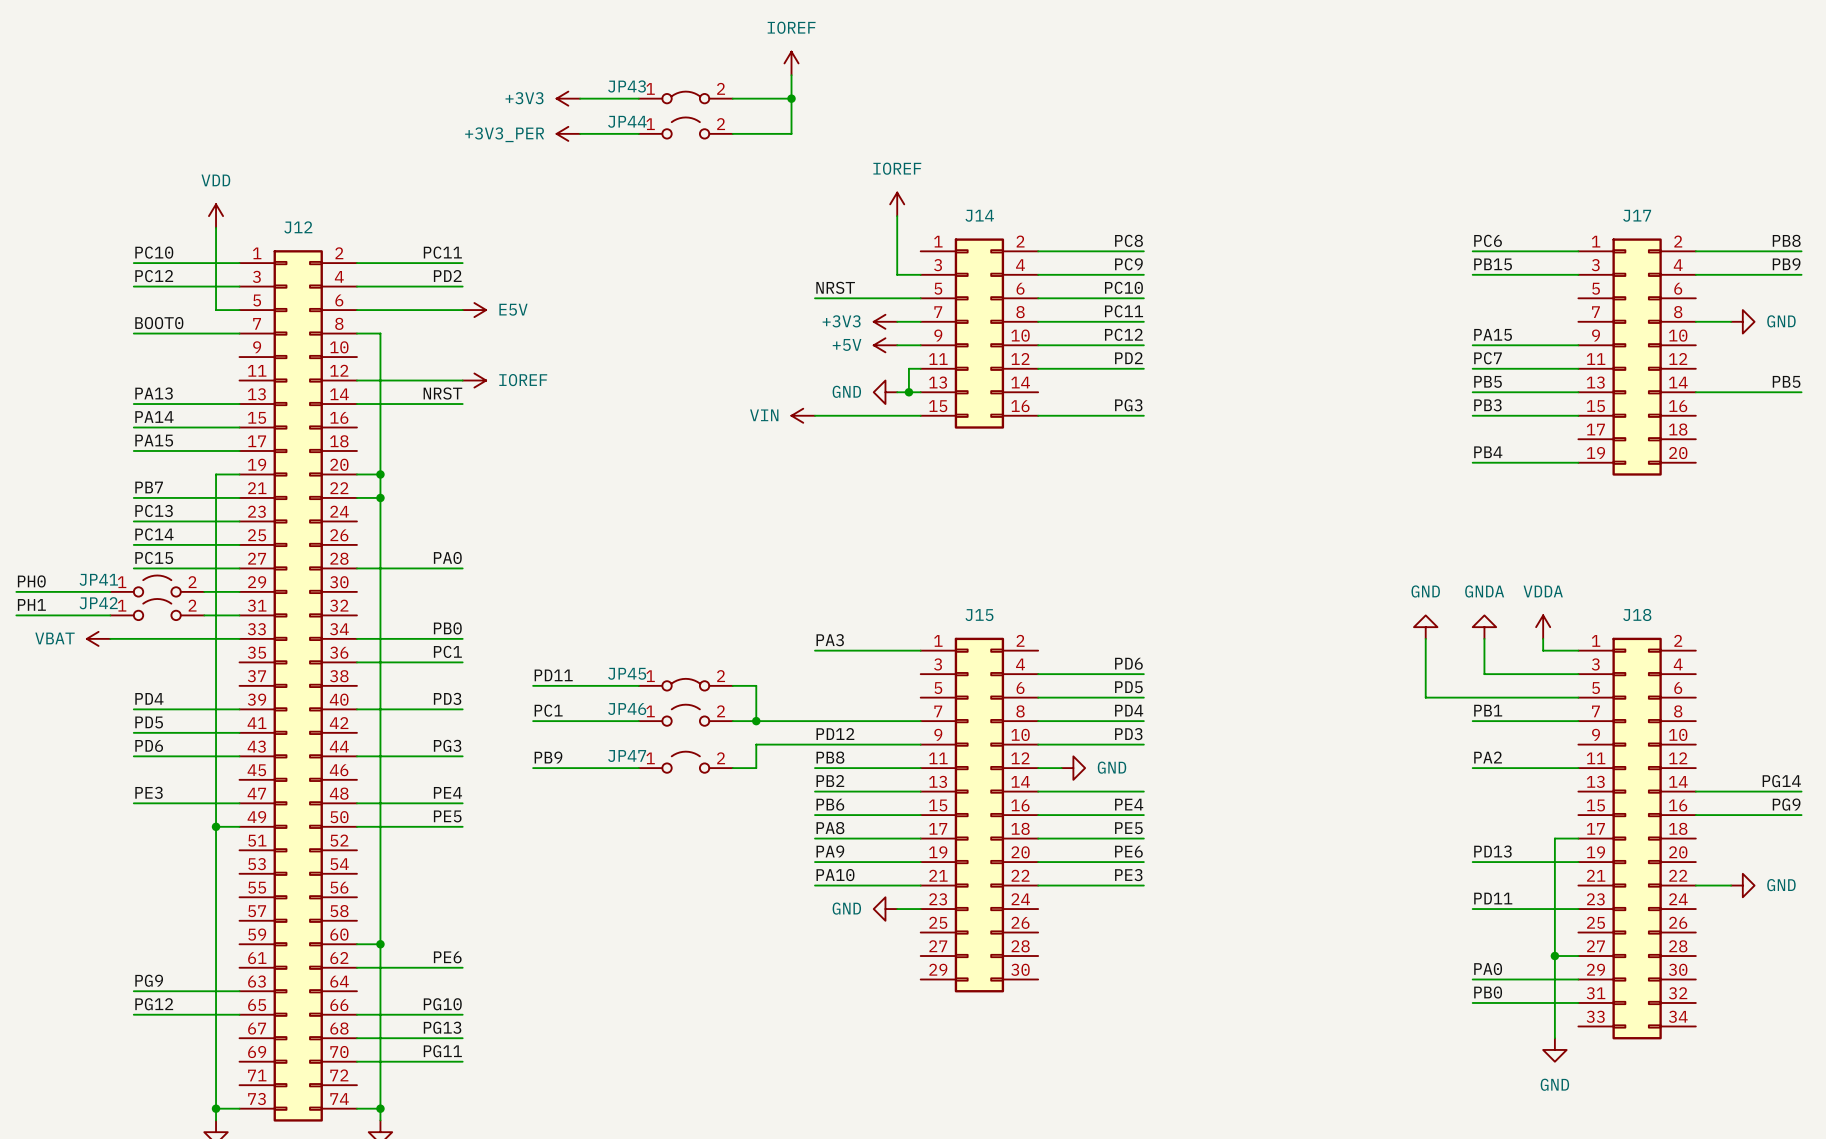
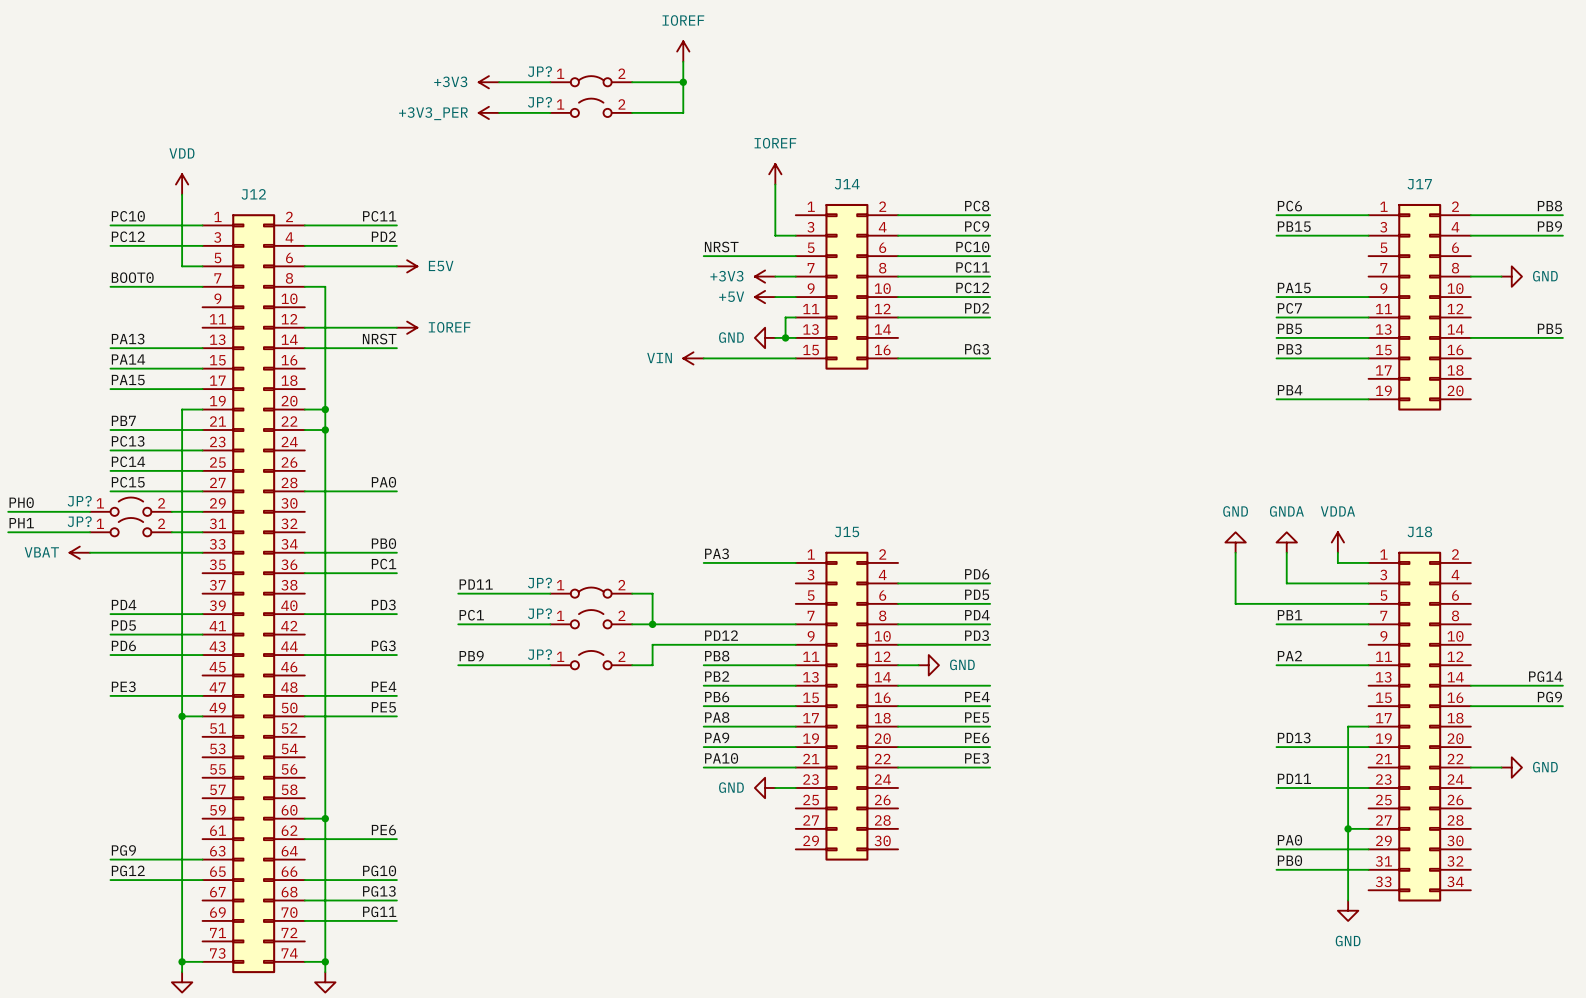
JP43 name: JP43 (627, 86) -> JP? (539, 71)
JP44 name: JP44 (627, 121) -> JP? (539, 102)
JP41 name: JP41 (98, 579) -> JP? (79, 501)
JP42 name: JP42 (98, 603) -> JP? (79, 521)
JP45 name: JP45 (627, 673) -> JP? (539, 583)
JP46 name: JP46 (627, 709) -> JP? (539, 613)
JP47 name: JP47 (627, 756) -> JP? (539, 654)

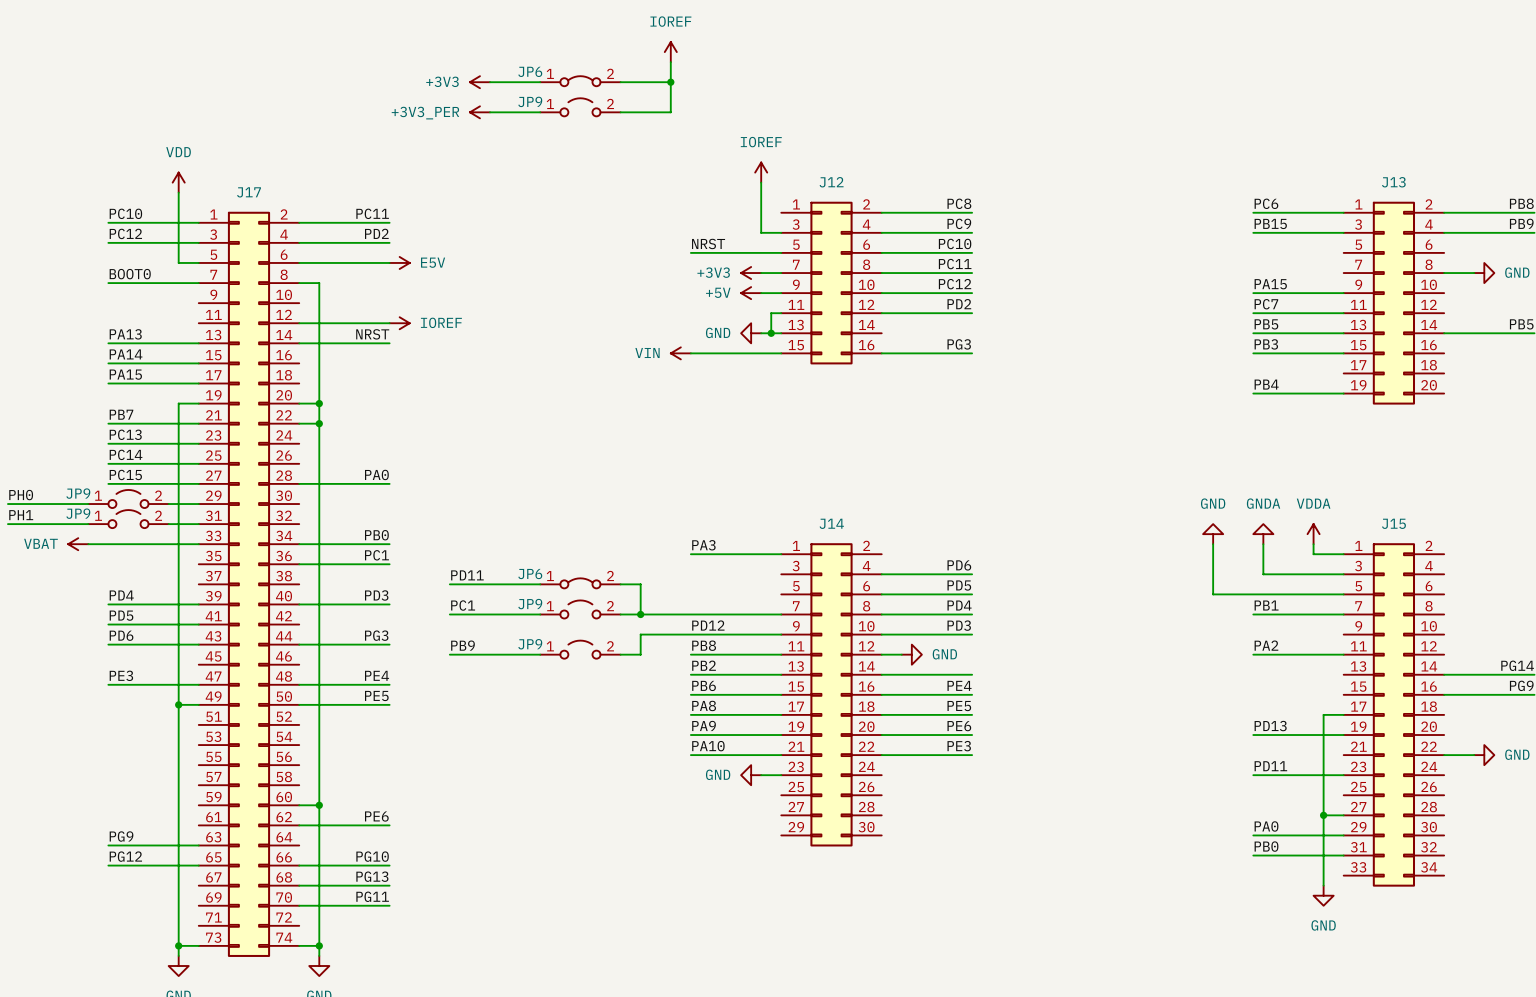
JP? name: JP? (539, 71) -> JP6 (530, 71)
JP? name: JP? (539, 102) -> JP9 (530, 101)
J14 name: J14 (847, 184) -> J12 (831, 182)
J17 name: J17 (1419, 184) -> J13 (1393, 182)
J12 name: J12 (253, 194) -> J17 (249, 192)
JP? name: JP? (79, 501) -> JP9 (78, 493)
JP? name: JP? (79, 521) -> JP9 (78, 513)
J15 name: J15 (846, 531) -> J14 (831, 523)
J18 name: J18 (1419, 531) -> J15 (1393, 523)
JP? name: JP? (539, 583) -> JP6 (530, 574)
JP? name: JP? (539, 613) -> JP9 (530, 604)
JP? name: JP? (539, 654) -> JP9 (530, 644)

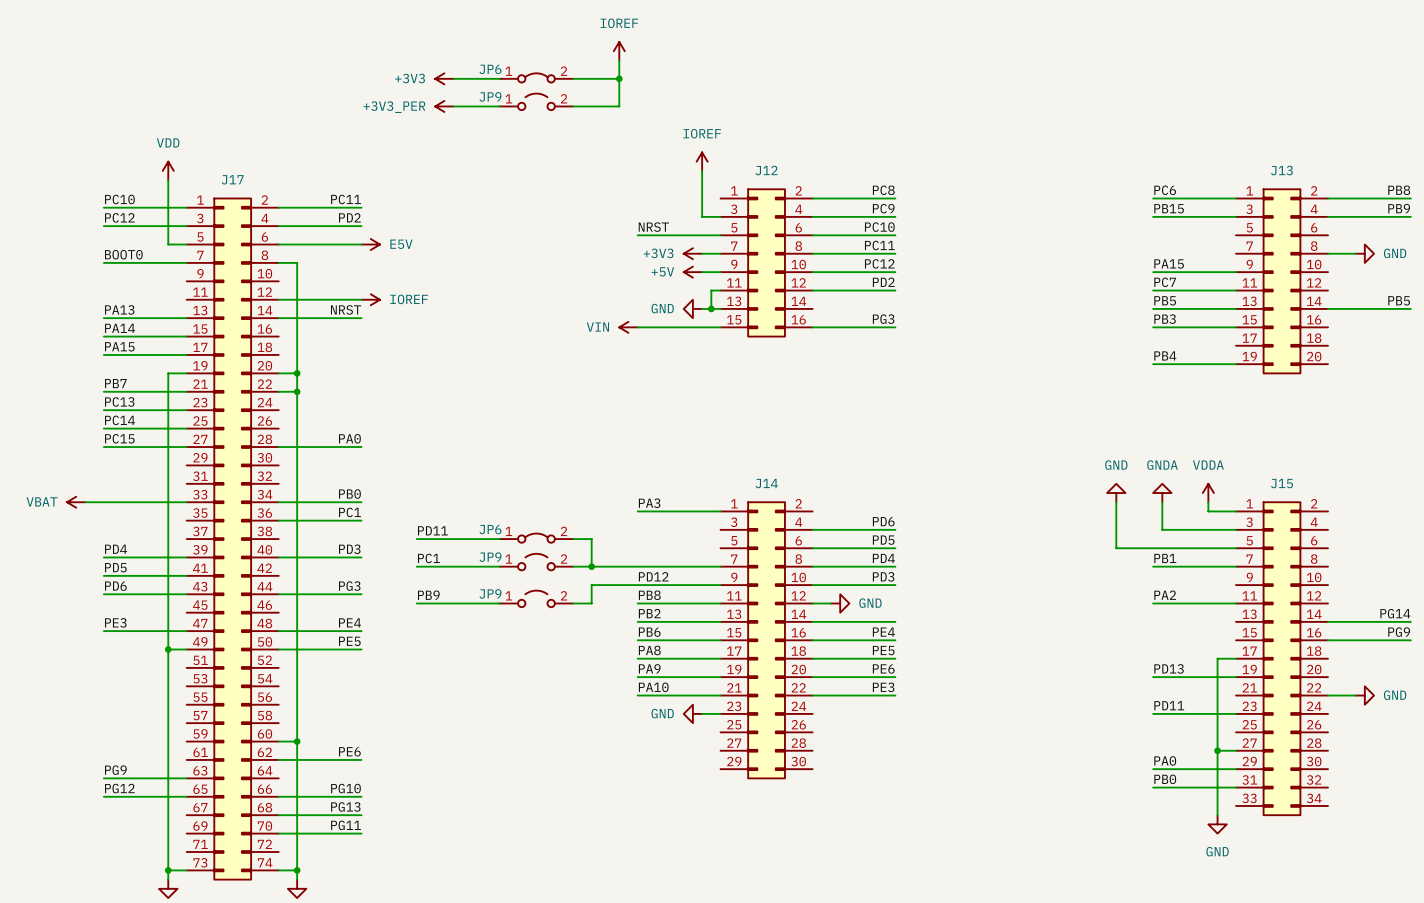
label: PH0 (21, 495) -> none
JP9: (128, 498) -> none
wire: (7, 504) (88, 504) -> none
wire: (168, 504) (198, 504) -> none
label: PH1 (21, 515) -> none
JP9: (128, 519) -> none
wire: (7, 524) (88, 524) -> none
wire: (168, 524) (198, 524) -> none

